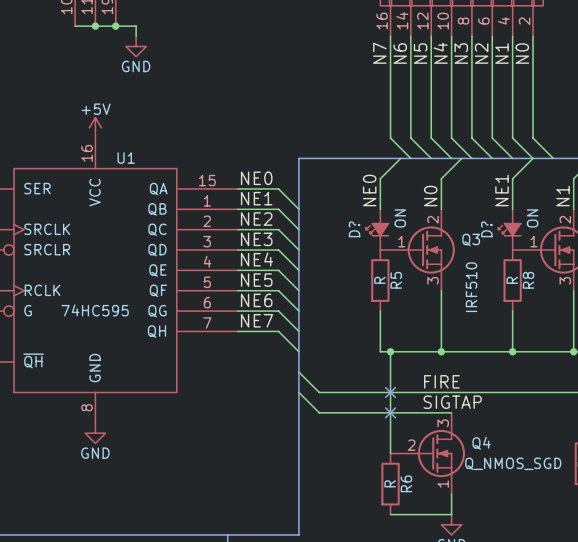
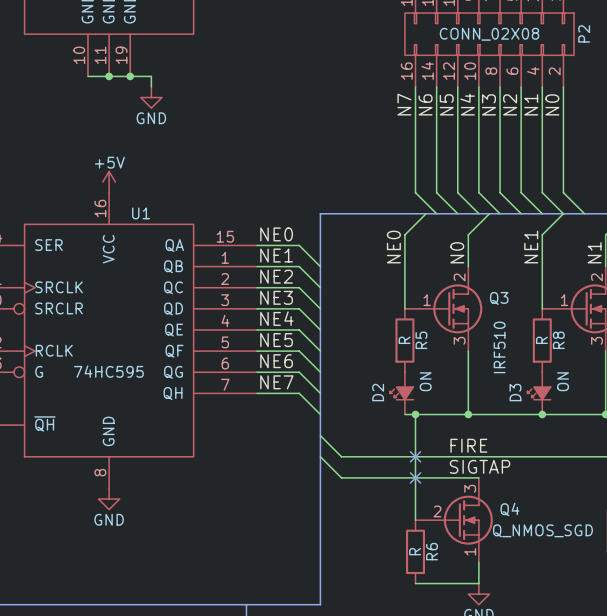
D?: ON (377, 229) -> none
D?: ON (509, 229) -> none
D2: none -> ON (401, 393)
D3: none -> ON (539, 393)

